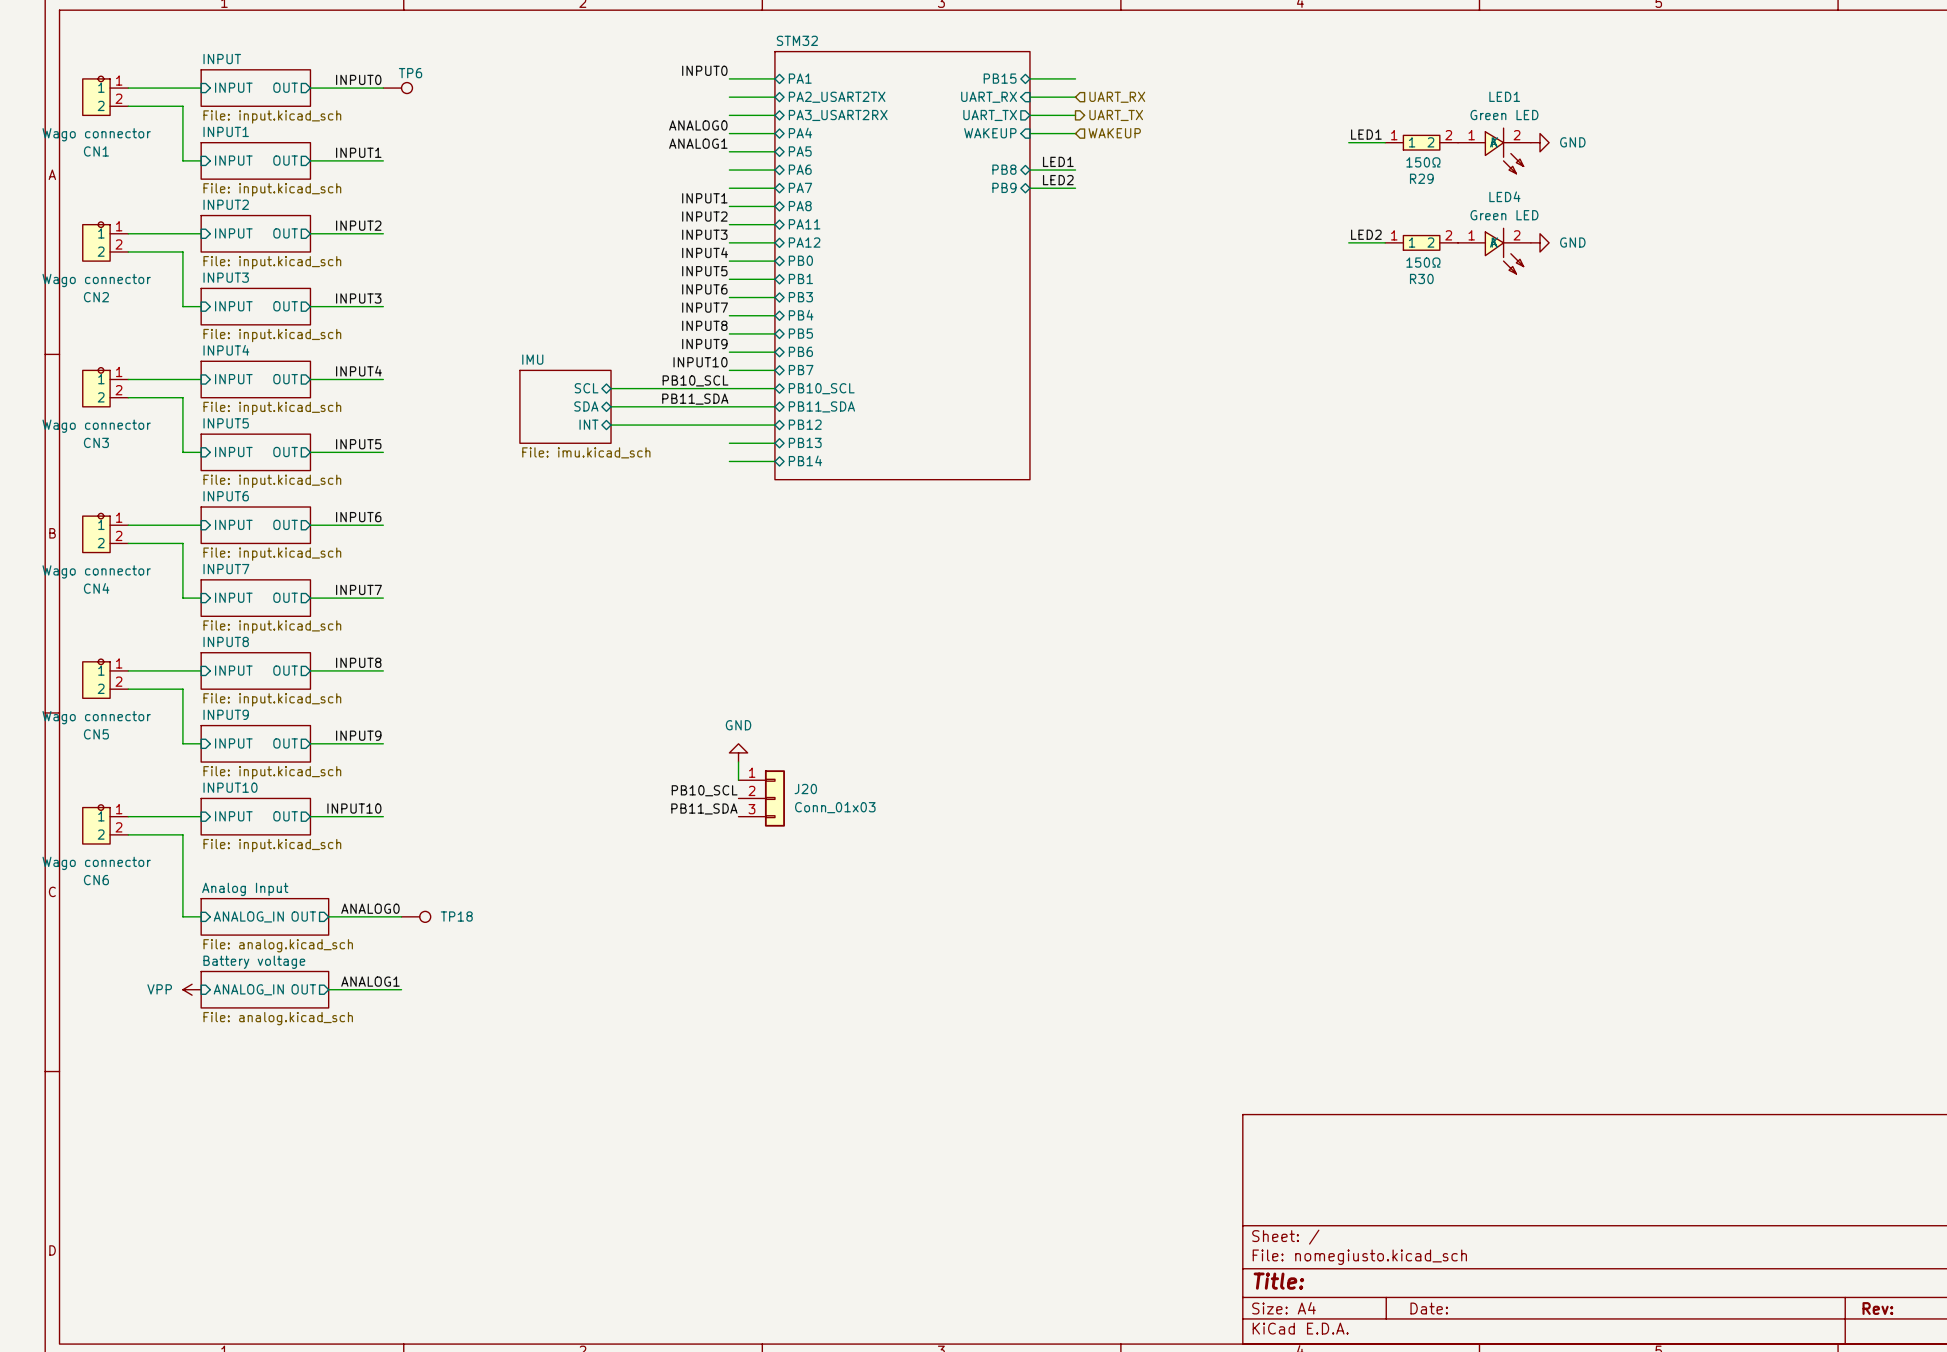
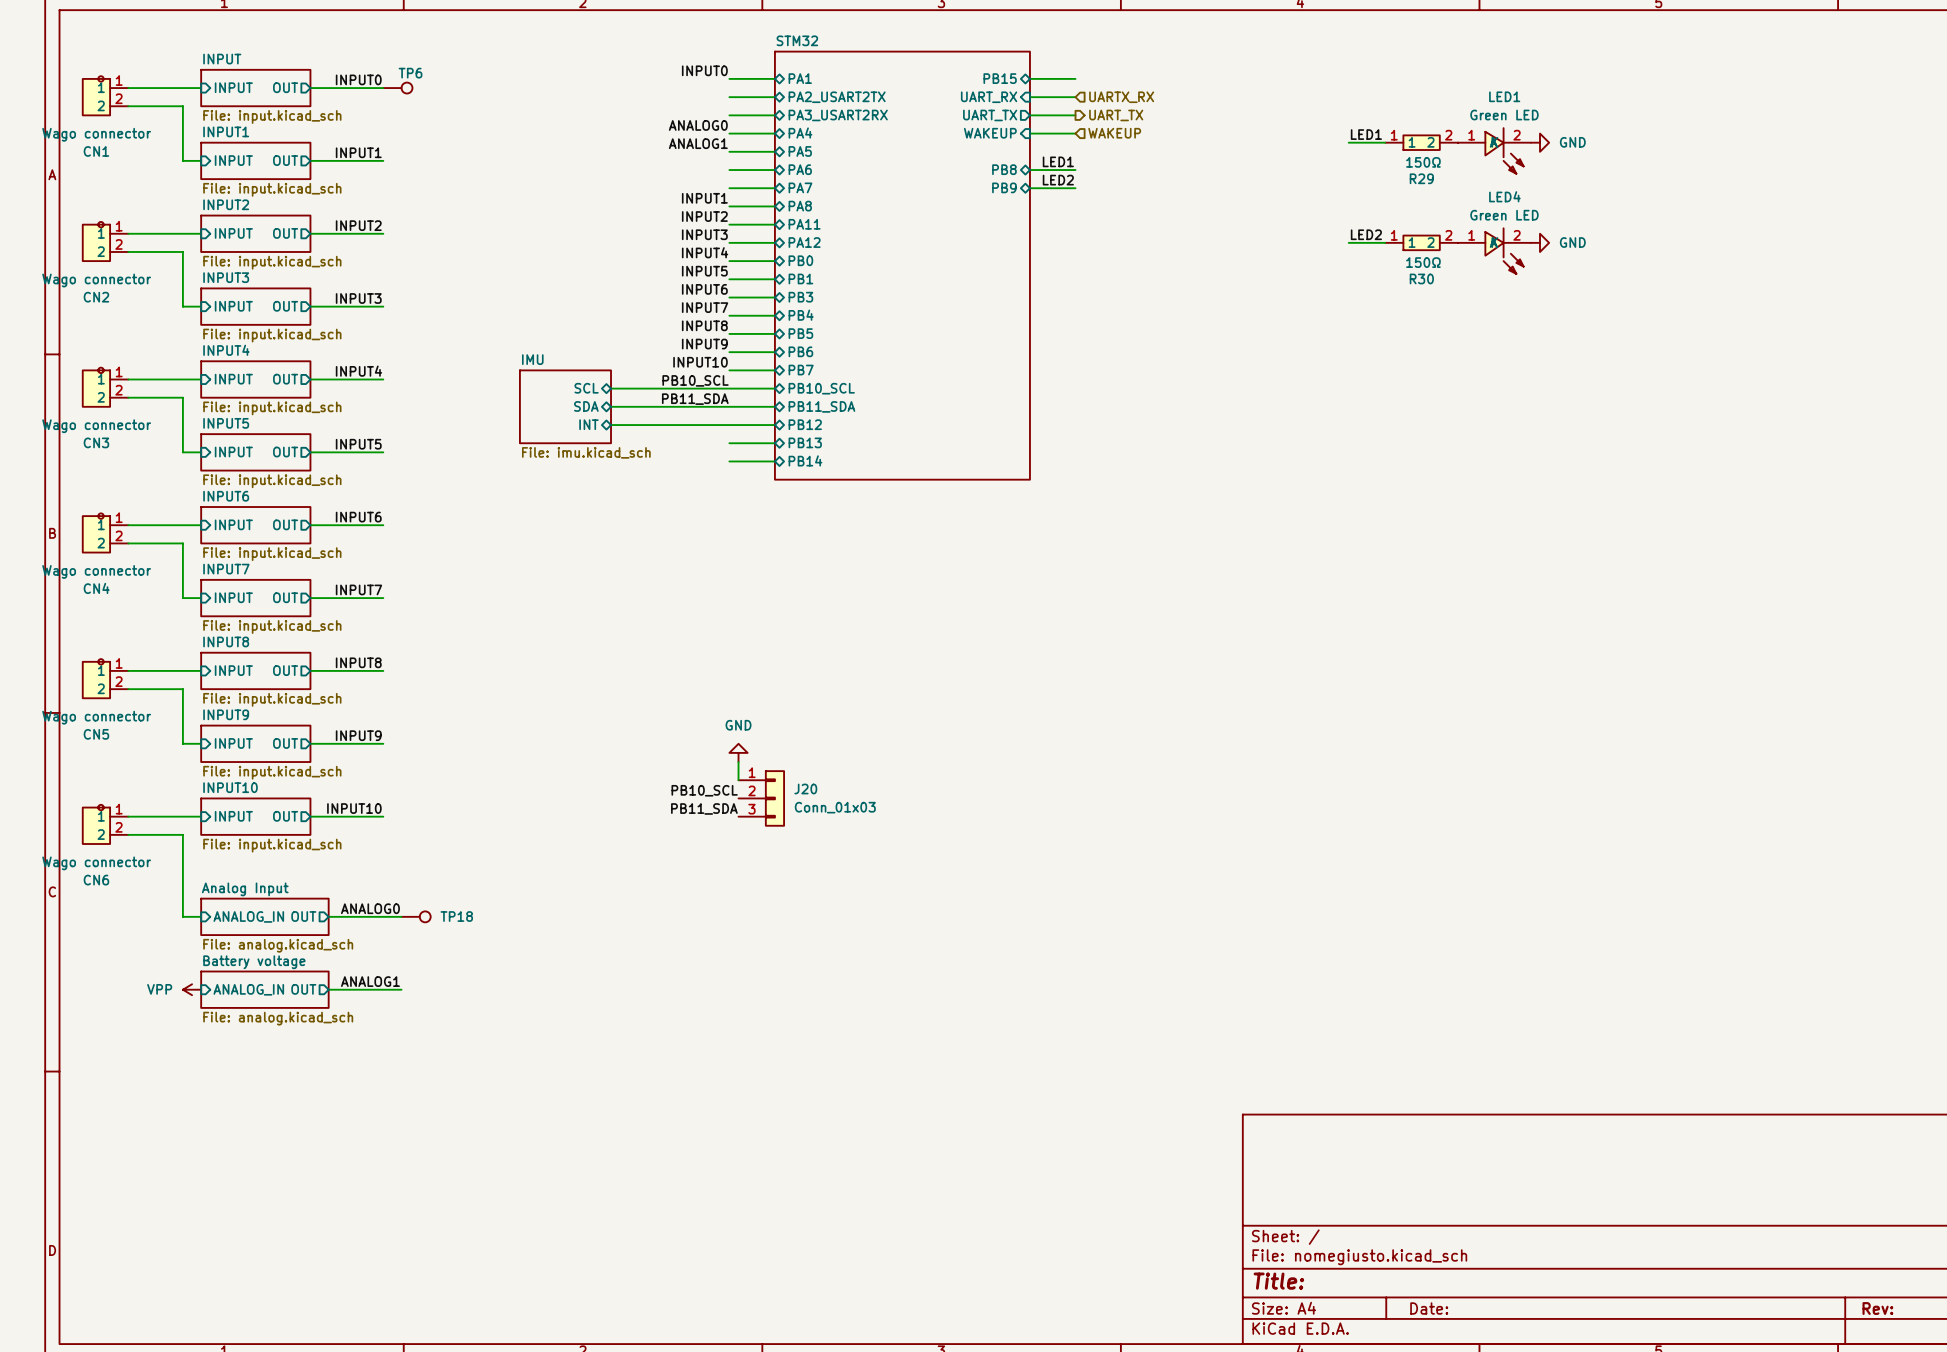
hierarchical label: UART_RX (1117, 97) -> UARTX_RX (1121, 97)

